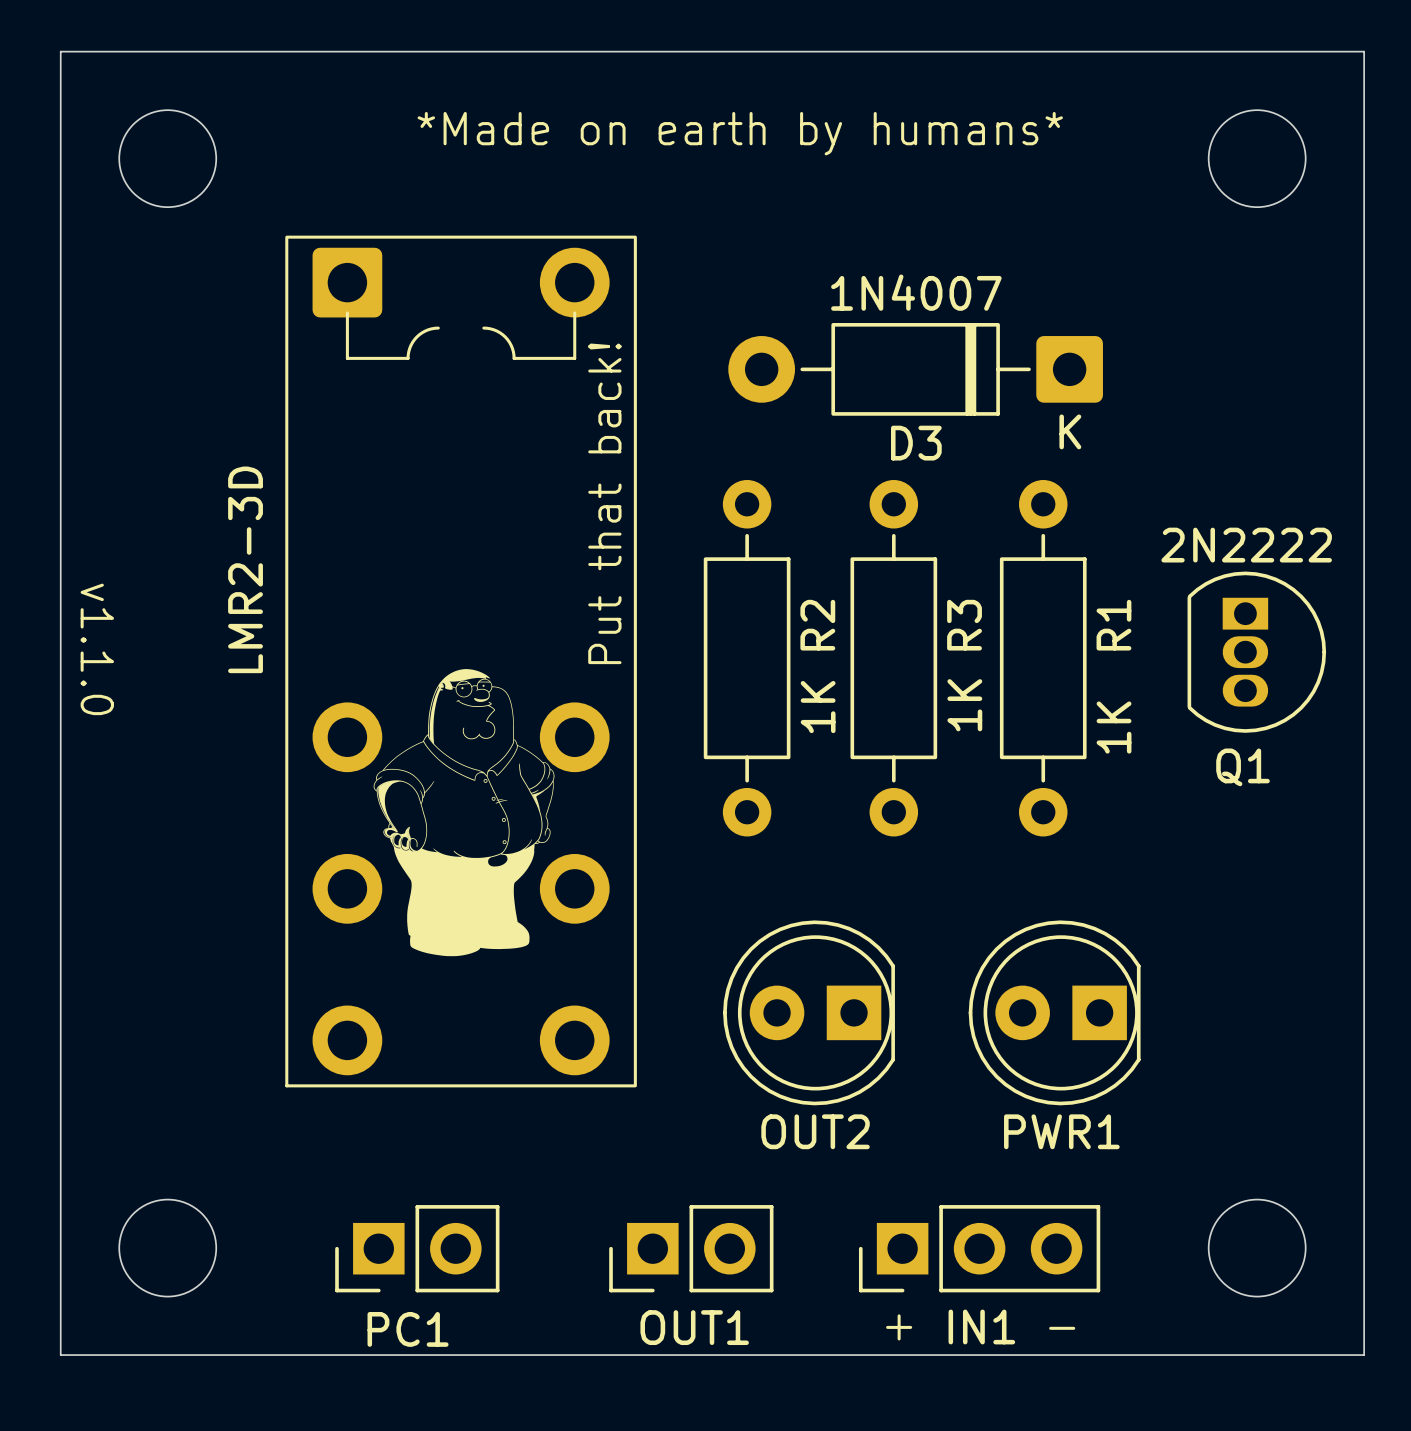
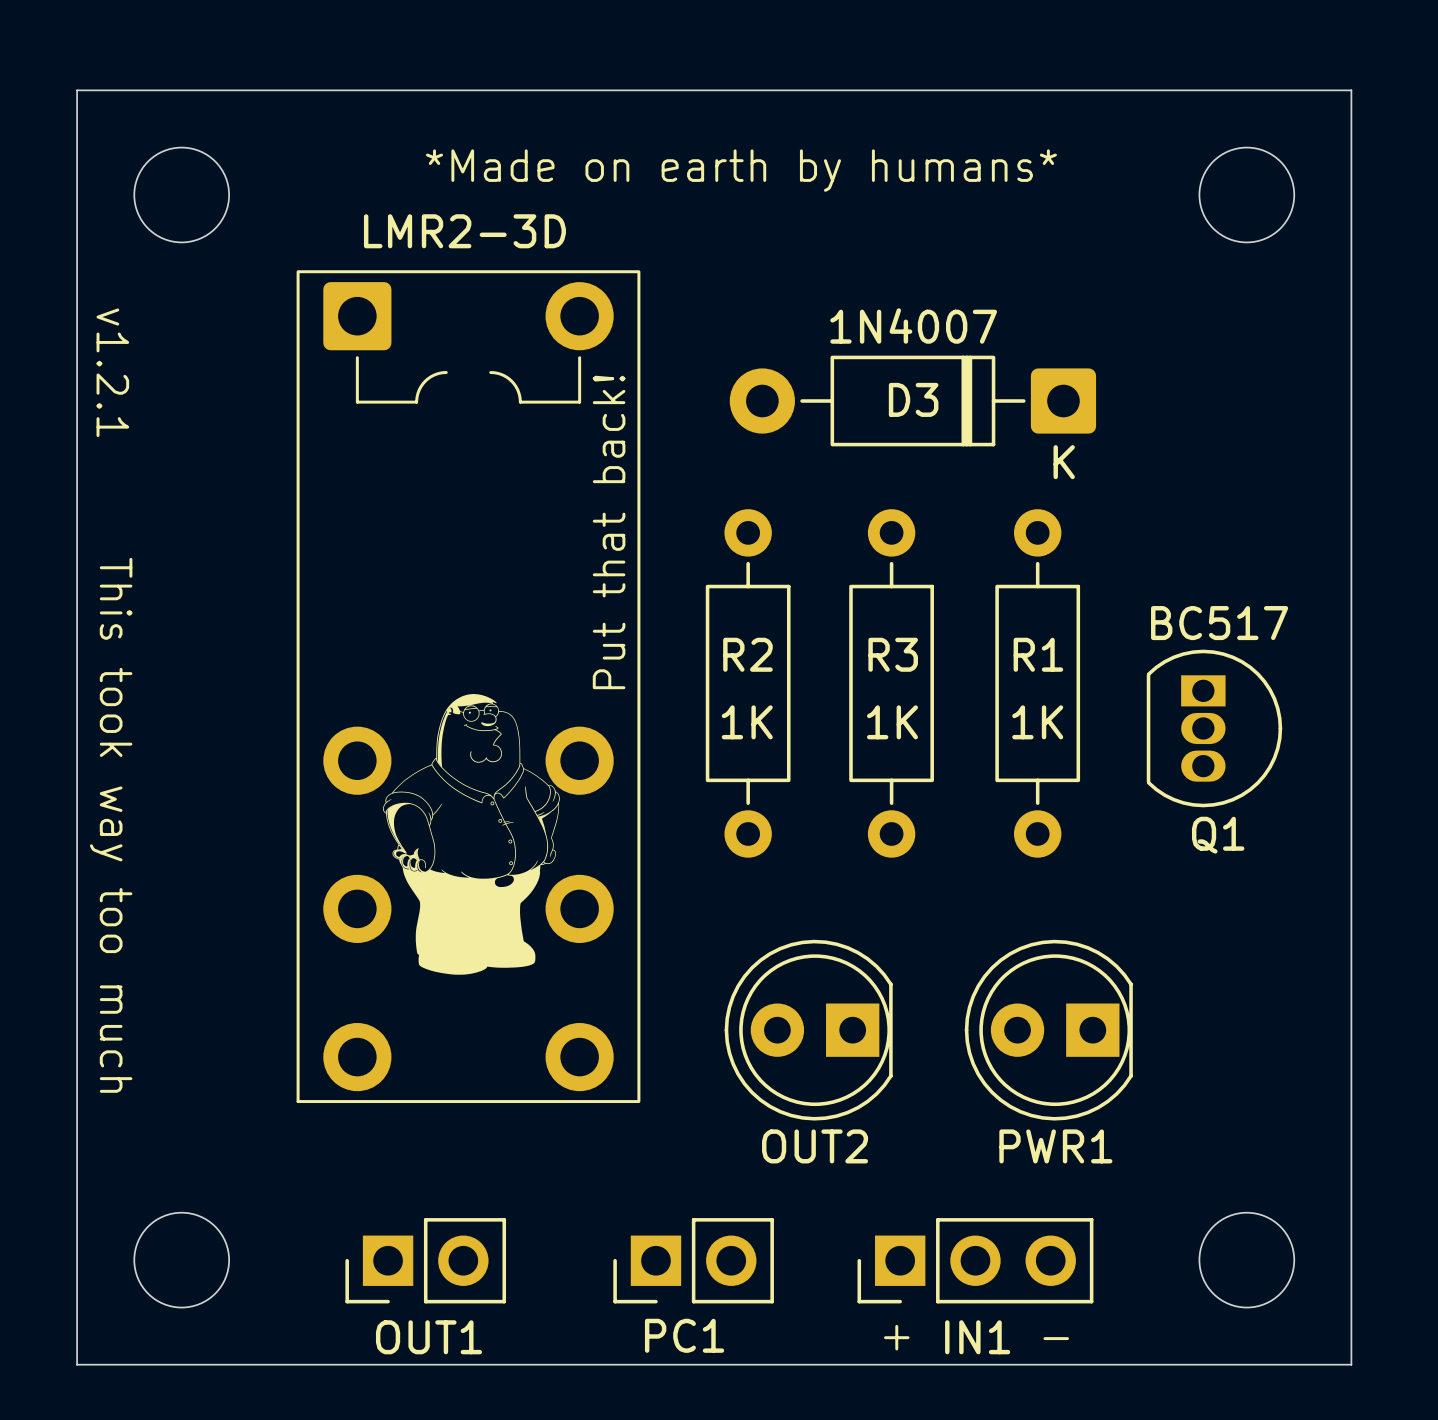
part footprint: [285, 235, 637, 1088] -> [296, 270, 641, 1104]
text: none -> v1.2.1 (112, 372)
D3 name position: D3 (916, 443) -> D3 (913, 399)
Q1 value: 2N2222 (1246, 545) -> BC517 (1219, 623)
part value rotation: 0° (245, 569) -> 90° clockwise (464, 231)
part value position: LMR2-3D (245, 569) -> LMR2-3D (464, 231)
R2 name rotation: 0° (817, 625) -> 90° clockwise (747, 654)
R3 name rotation: 0° (964, 625) -> 90° clockwise (893, 654)
R1 name rotation: 0° (1113, 625) -> 90° clockwise (1038, 654)
text: v1.1.0 (97, 649) -> none
Q1 position: (1256, 652) -> (1214, 728)
R3 value rotation: 0° (964, 705) -> 90° clockwise (892, 722)
R2 value rotation: 0° (818, 707) -> 90° clockwise (747, 722)
R2 value position: 1K (818, 707) -> 1K (747, 722)
R1 value rotation: 0° (1114, 727) -> 90° clockwise (1037, 722)
R1 value position: 1K (1114, 727) -> 1K (1037, 722)
Q1 name position: Q1 (1243, 767) -> Q1 (1218, 835)
text: none -> This took way too much (111, 825)
OUT1 name: OUT1 (694, 1327) -> PC1 (684, 1335)
PC1 name: PC1 (408, 1329) -> OUT1 (428, 1337)

